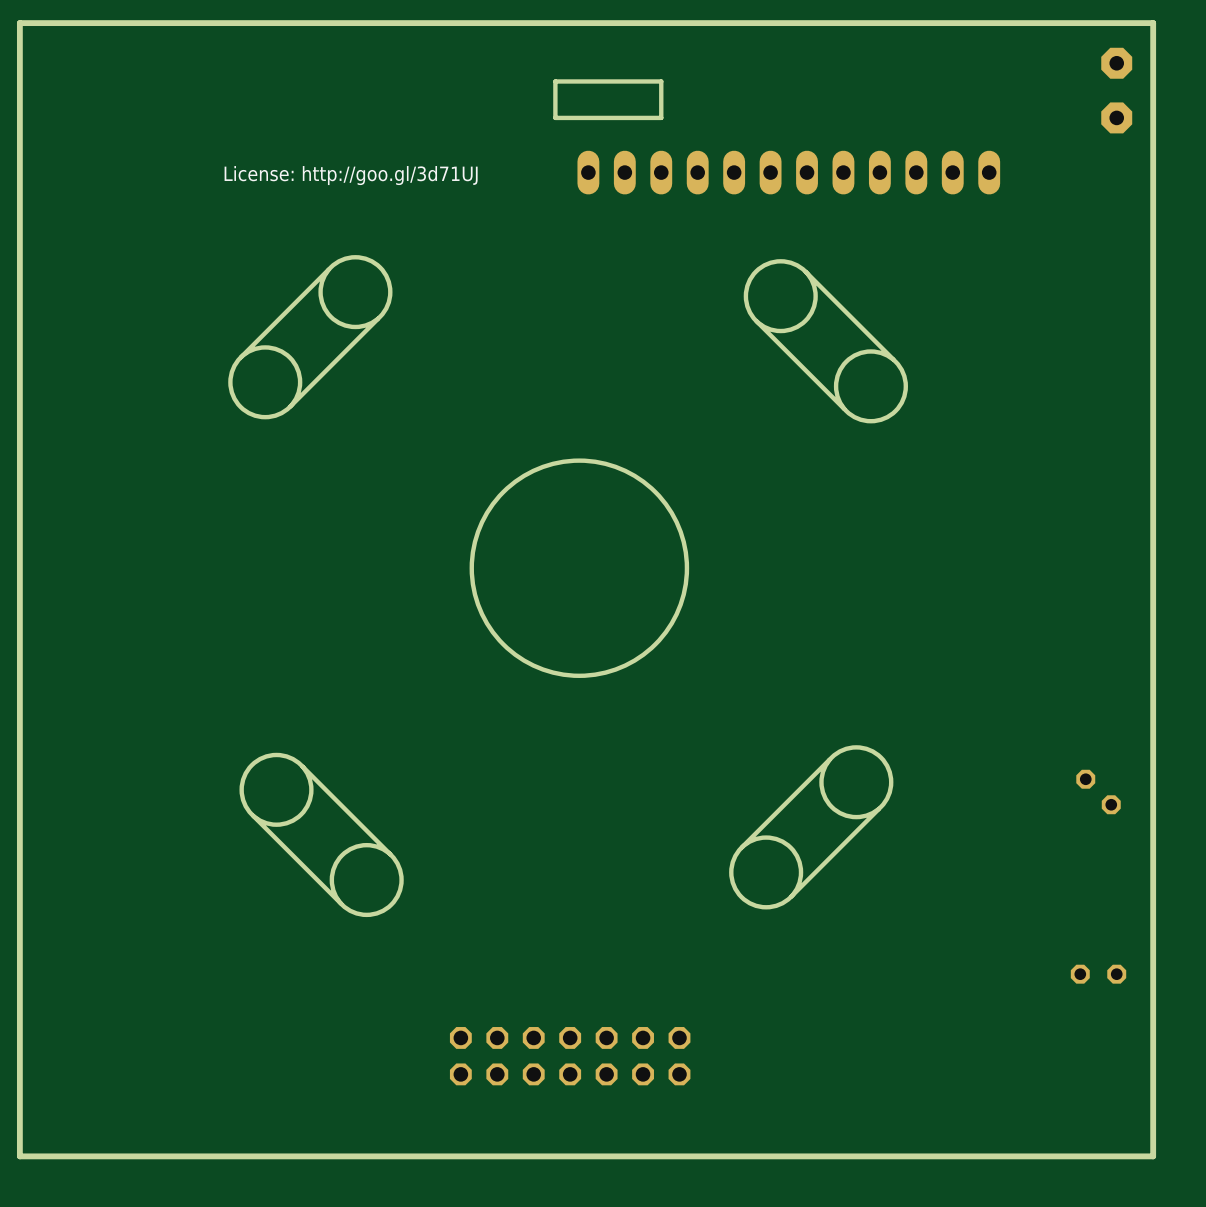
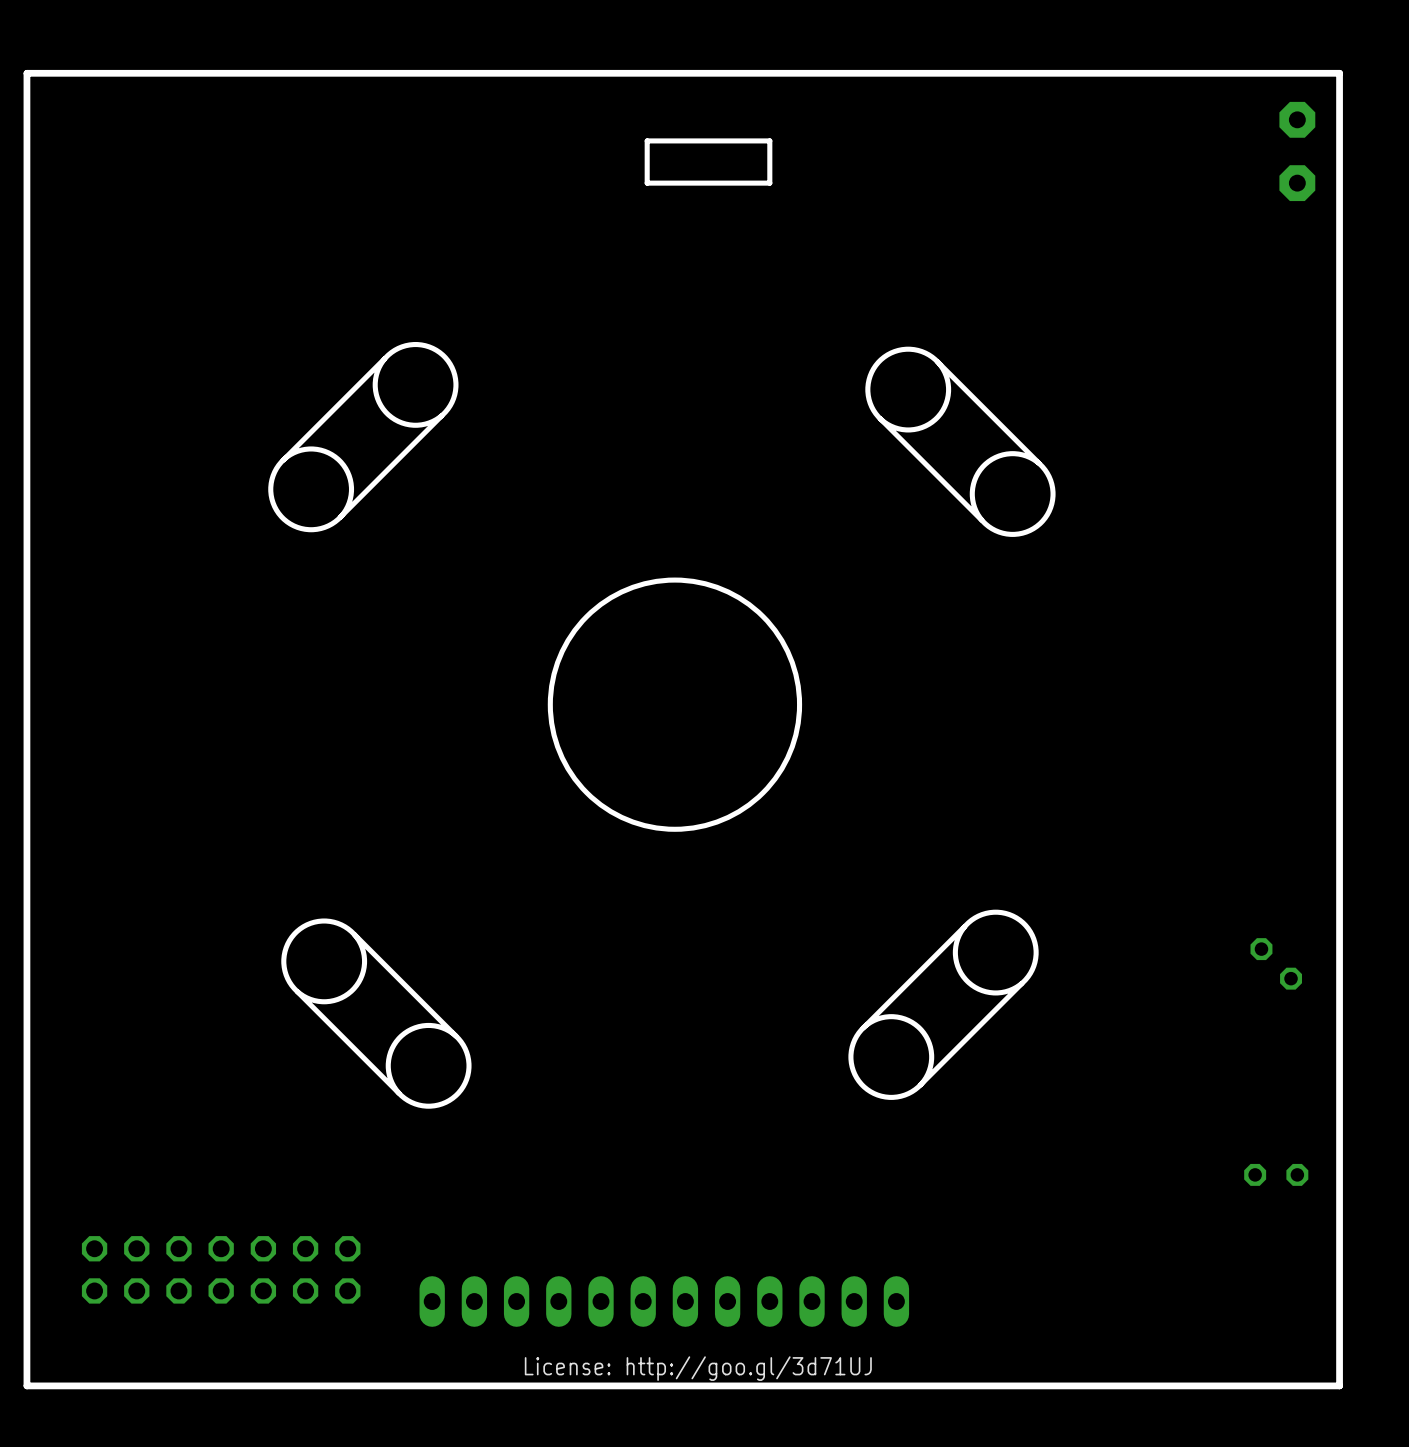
part: (788, 172) -> none
text: License: http://goo.gl/3d71UJ (351, 175) -> none
part: none -> (221, 1269)
part: (570, 1056) -> none
part: none -> (664, 1301)
text: none -> License: http://goo.gl/3d71UJ (698, 1368)

